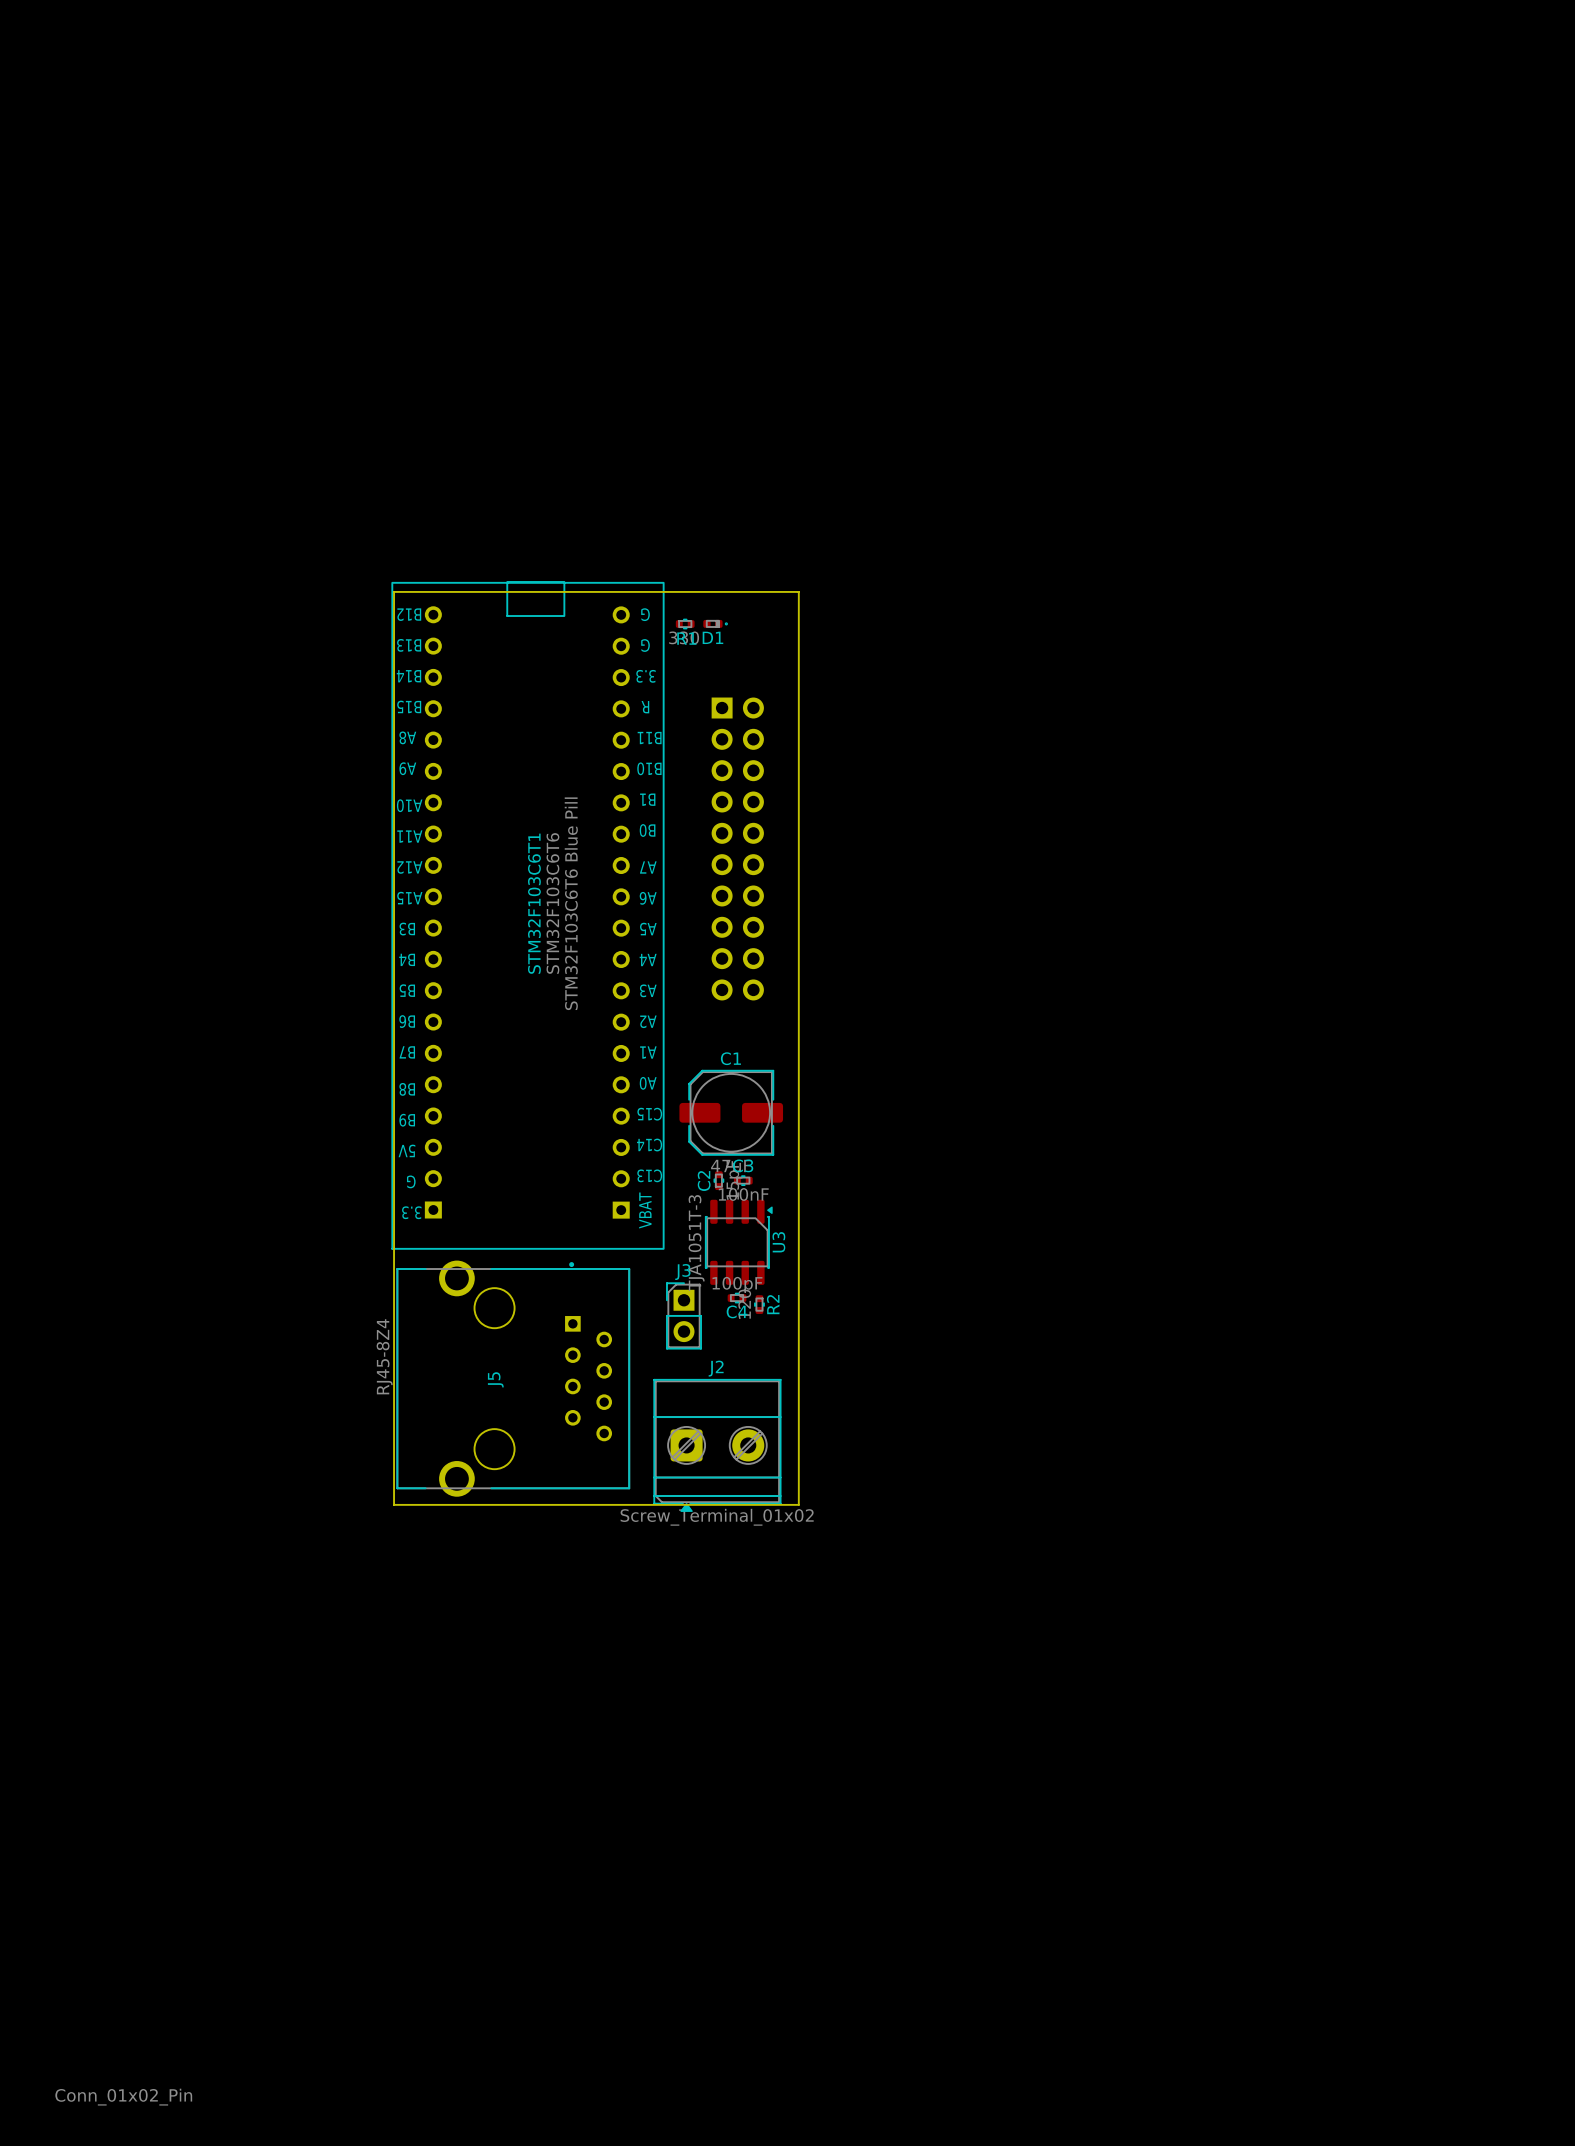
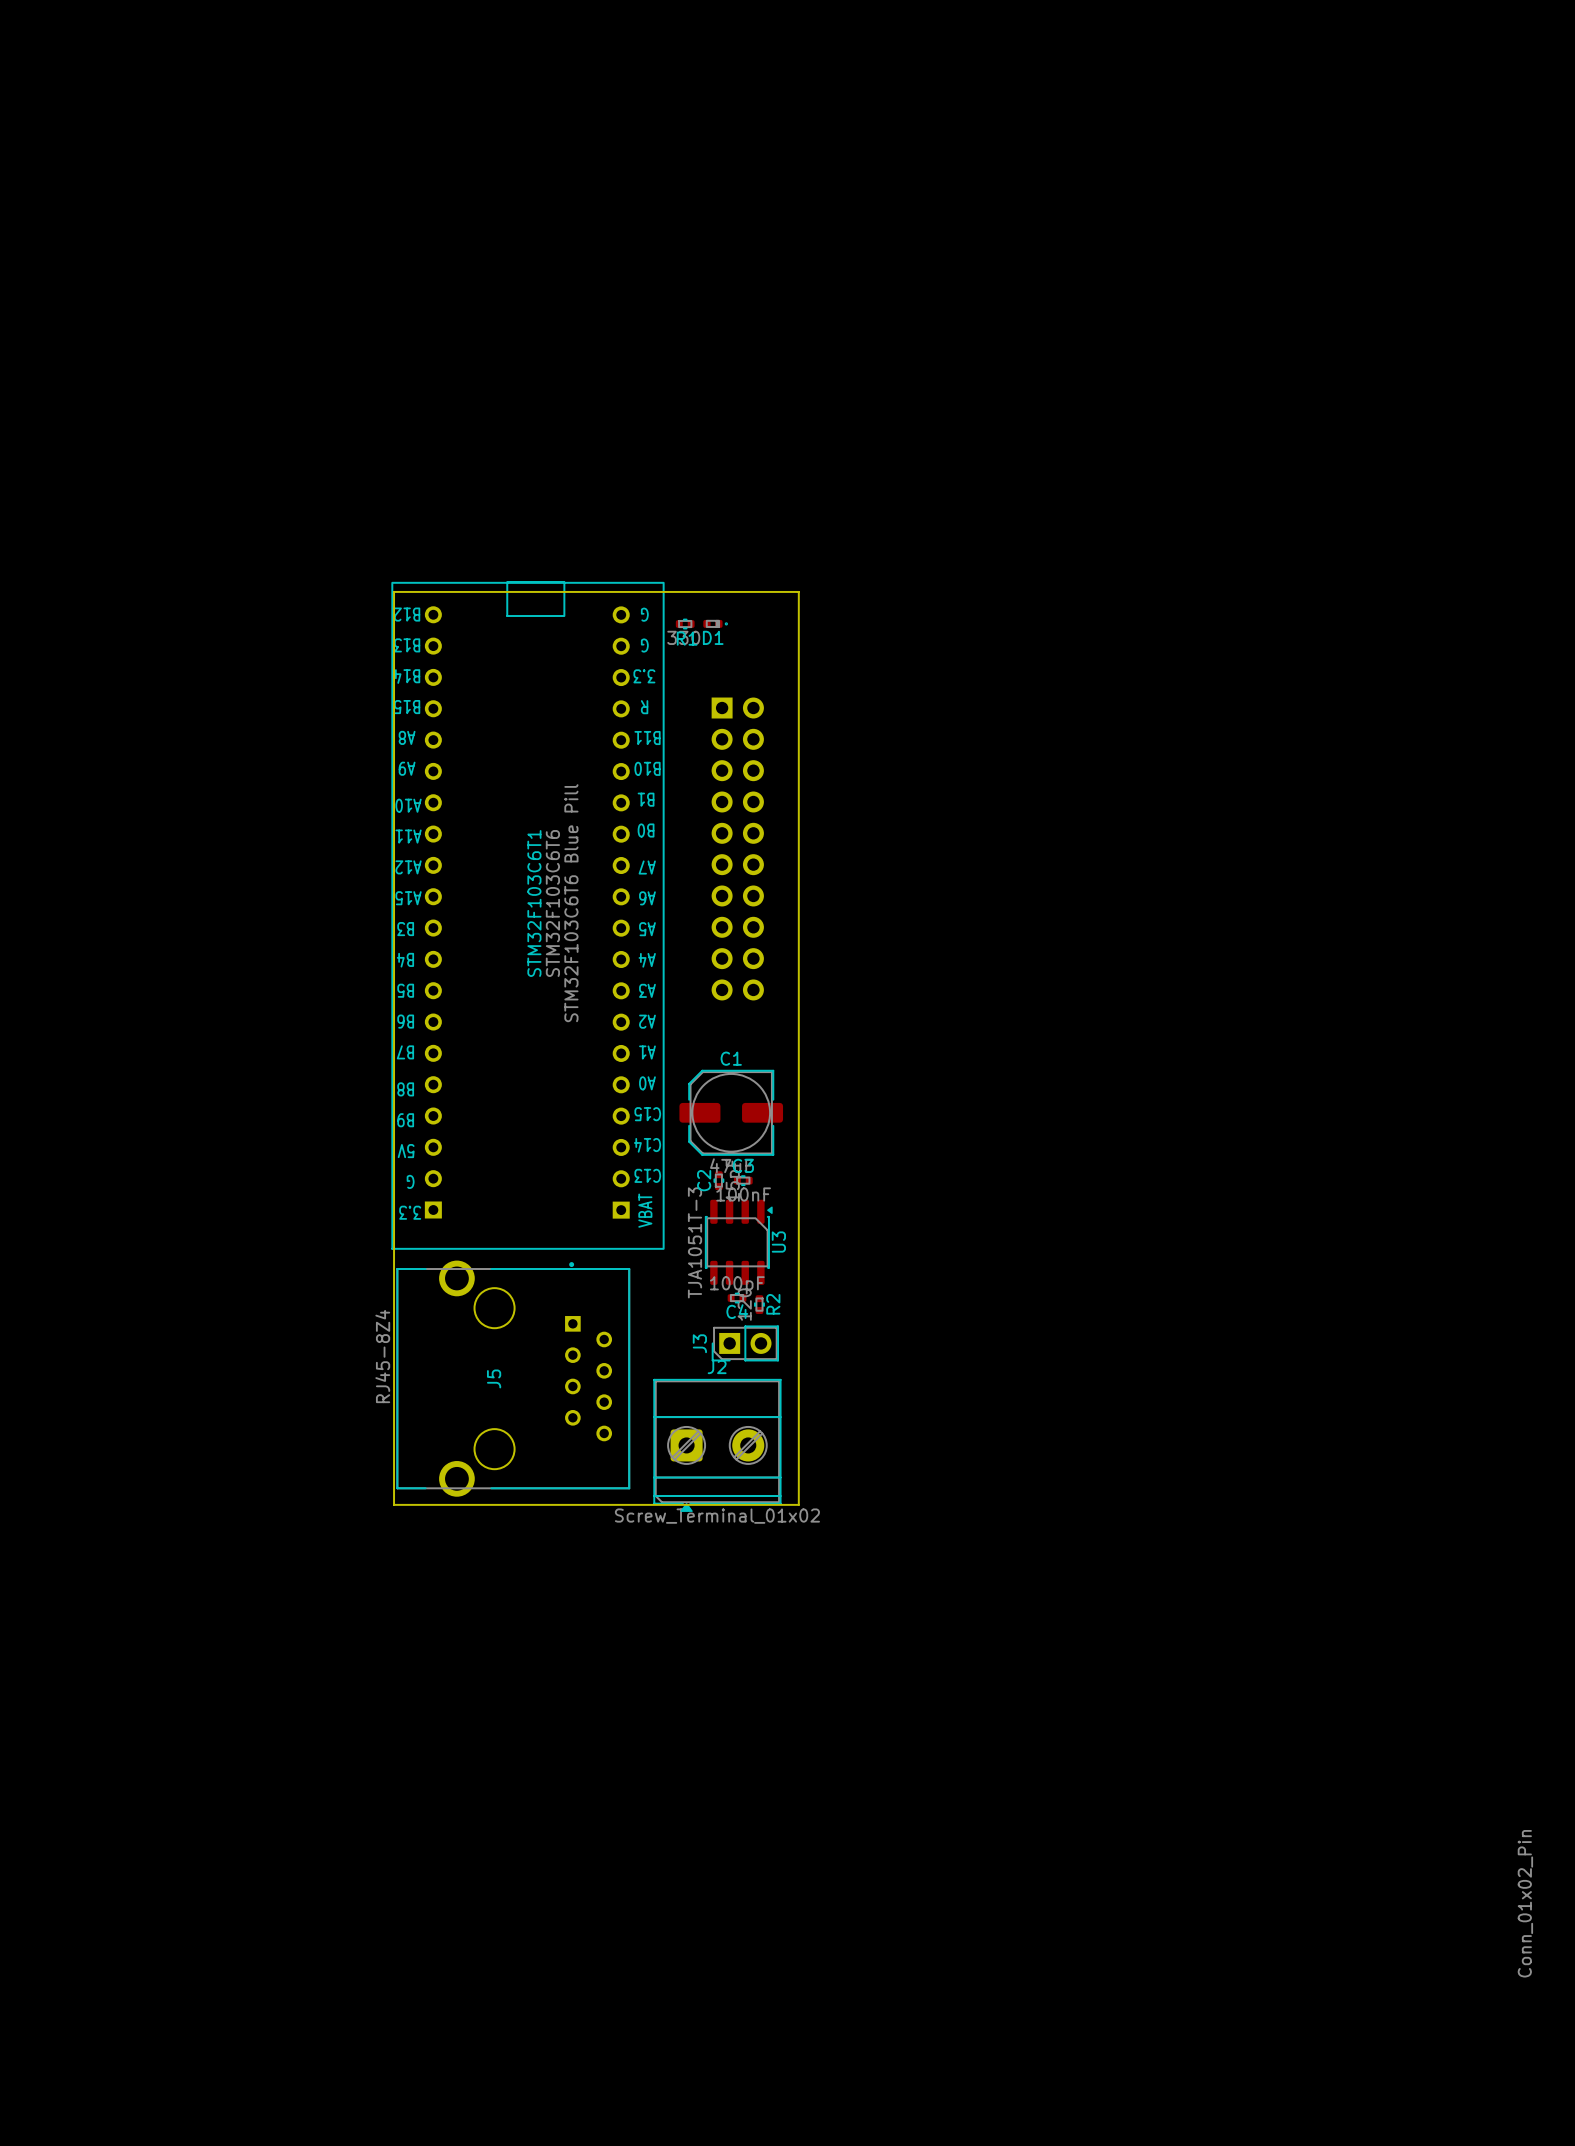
J3 rotation: 0° (684, 1315) -> 90° counterclockwise (745, 1343)
J3 position: (684, 1315) -> (745, 1343)

